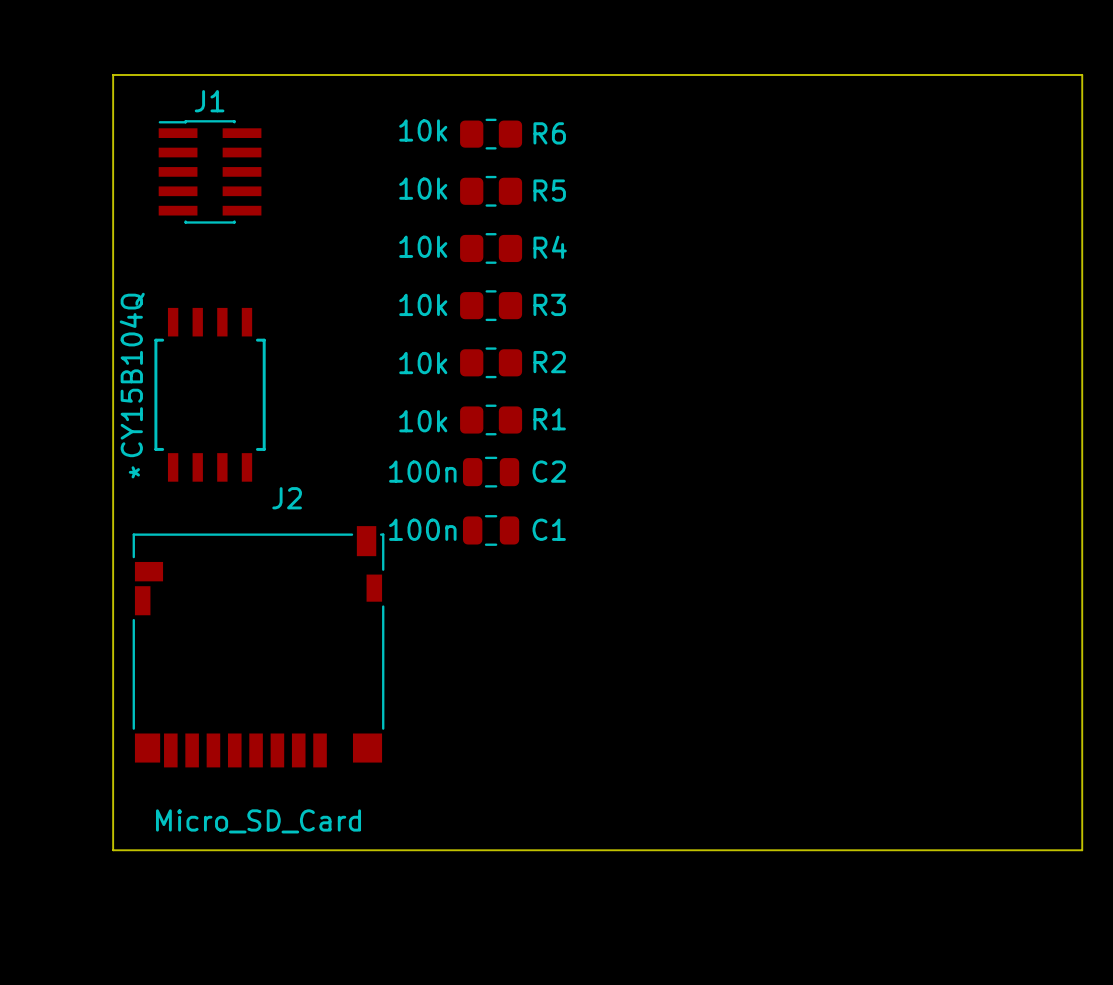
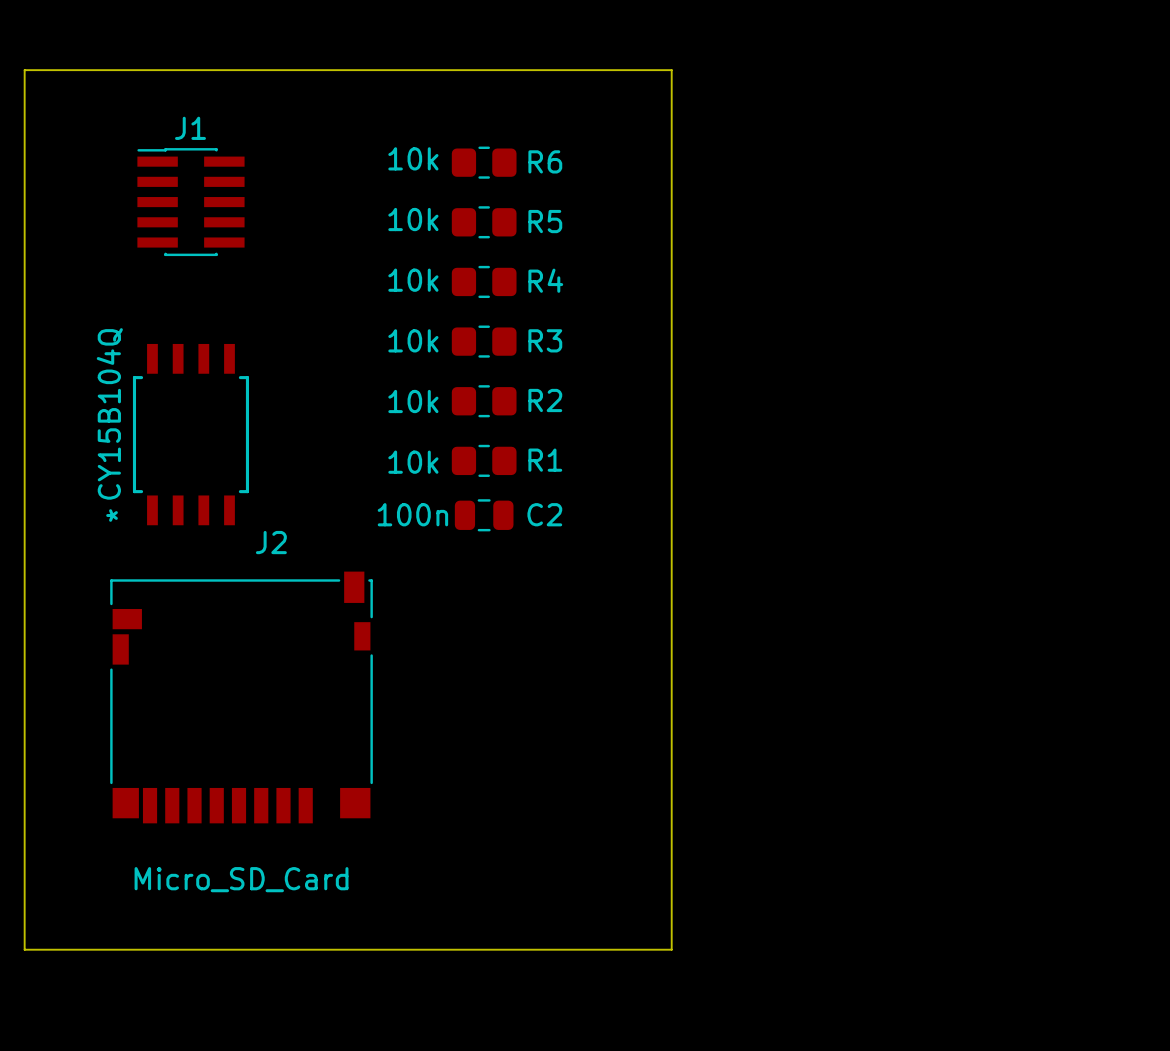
board edge: (113, 75) (1082, 75) (1082, 850) (113, 850) (113, 75) -> (24, 70) (24, 949) (671, 949) (671, 70) (24, 70)
C1: 100n (491, 530) -> none

